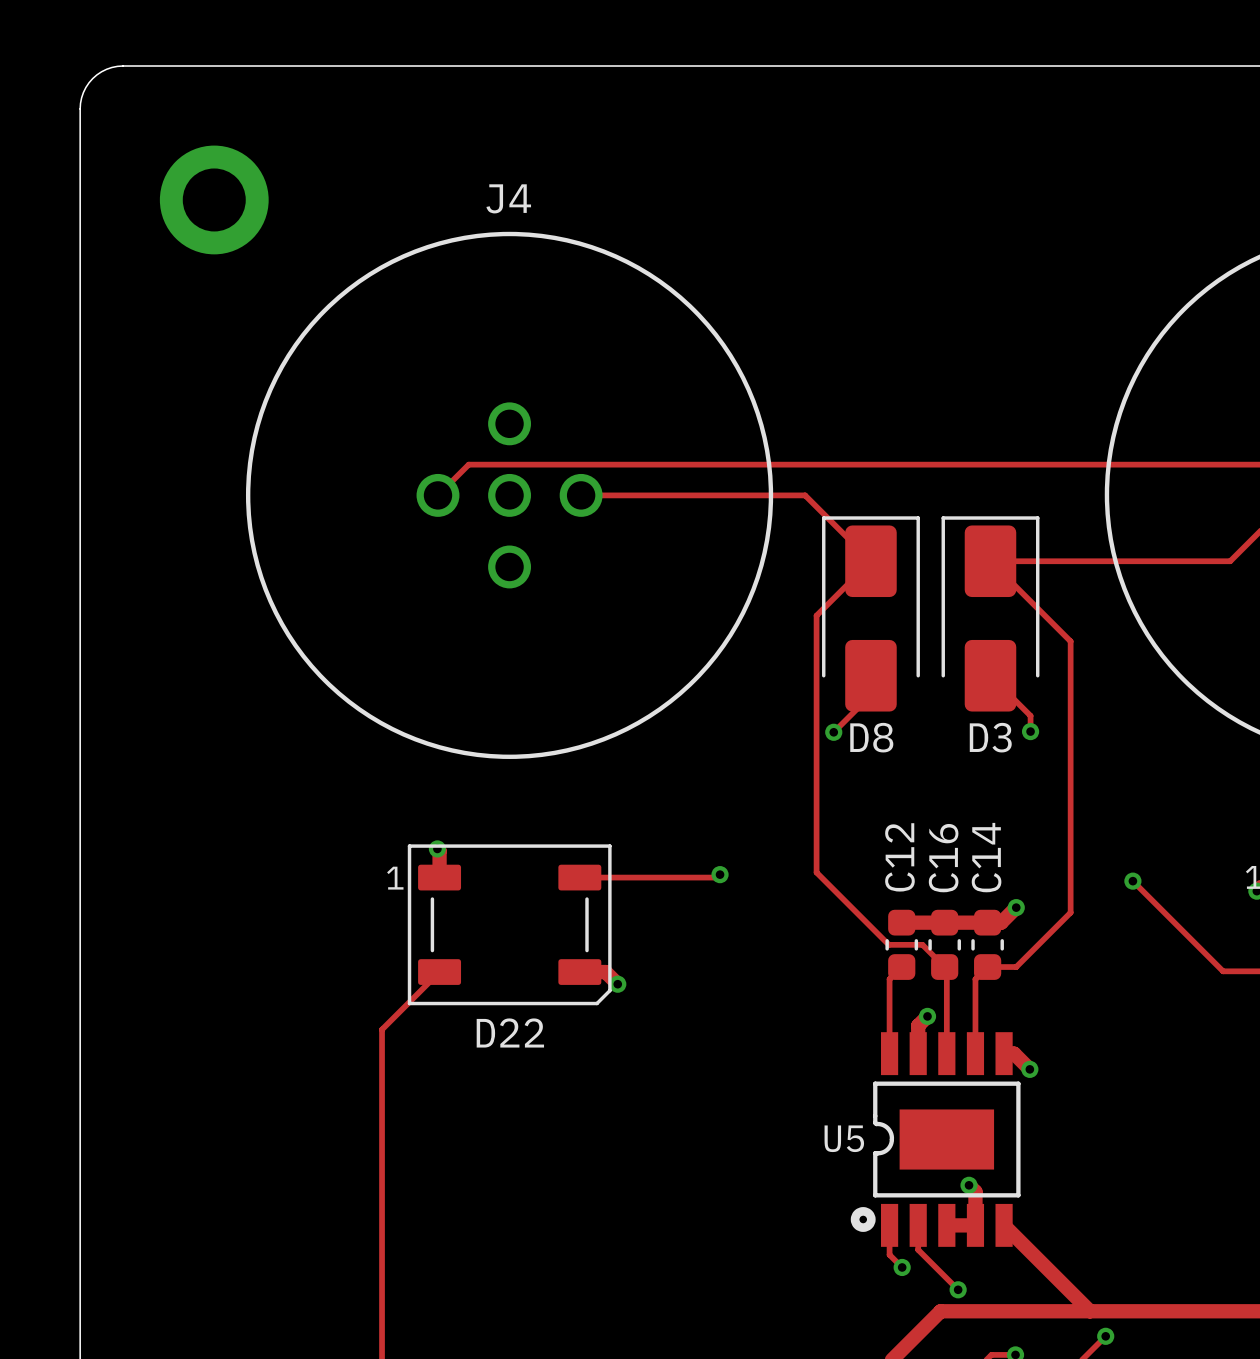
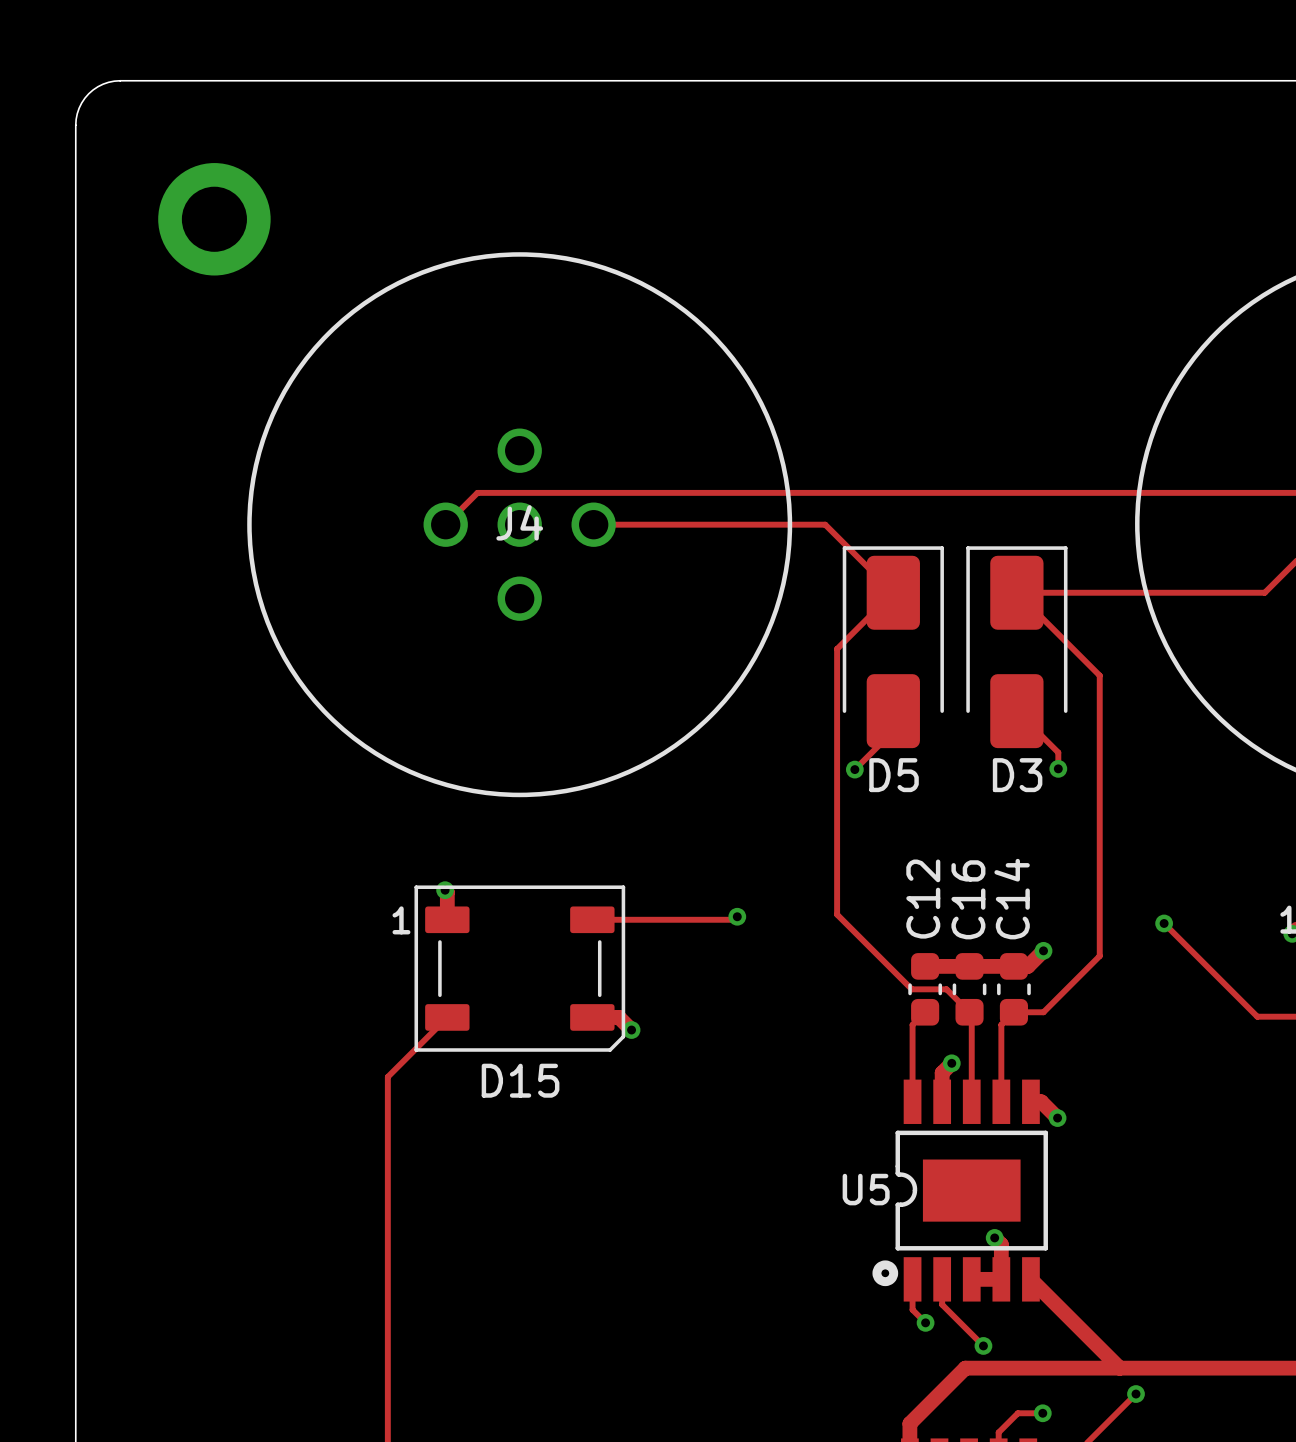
J4 name position: J4 (508, 198) -> J4 (519, 522)
D8 name: D8 (871, 737) -> D5 (894, 775)
D22 name: D22 (510, 1032) -> D15 (520, 1080)

